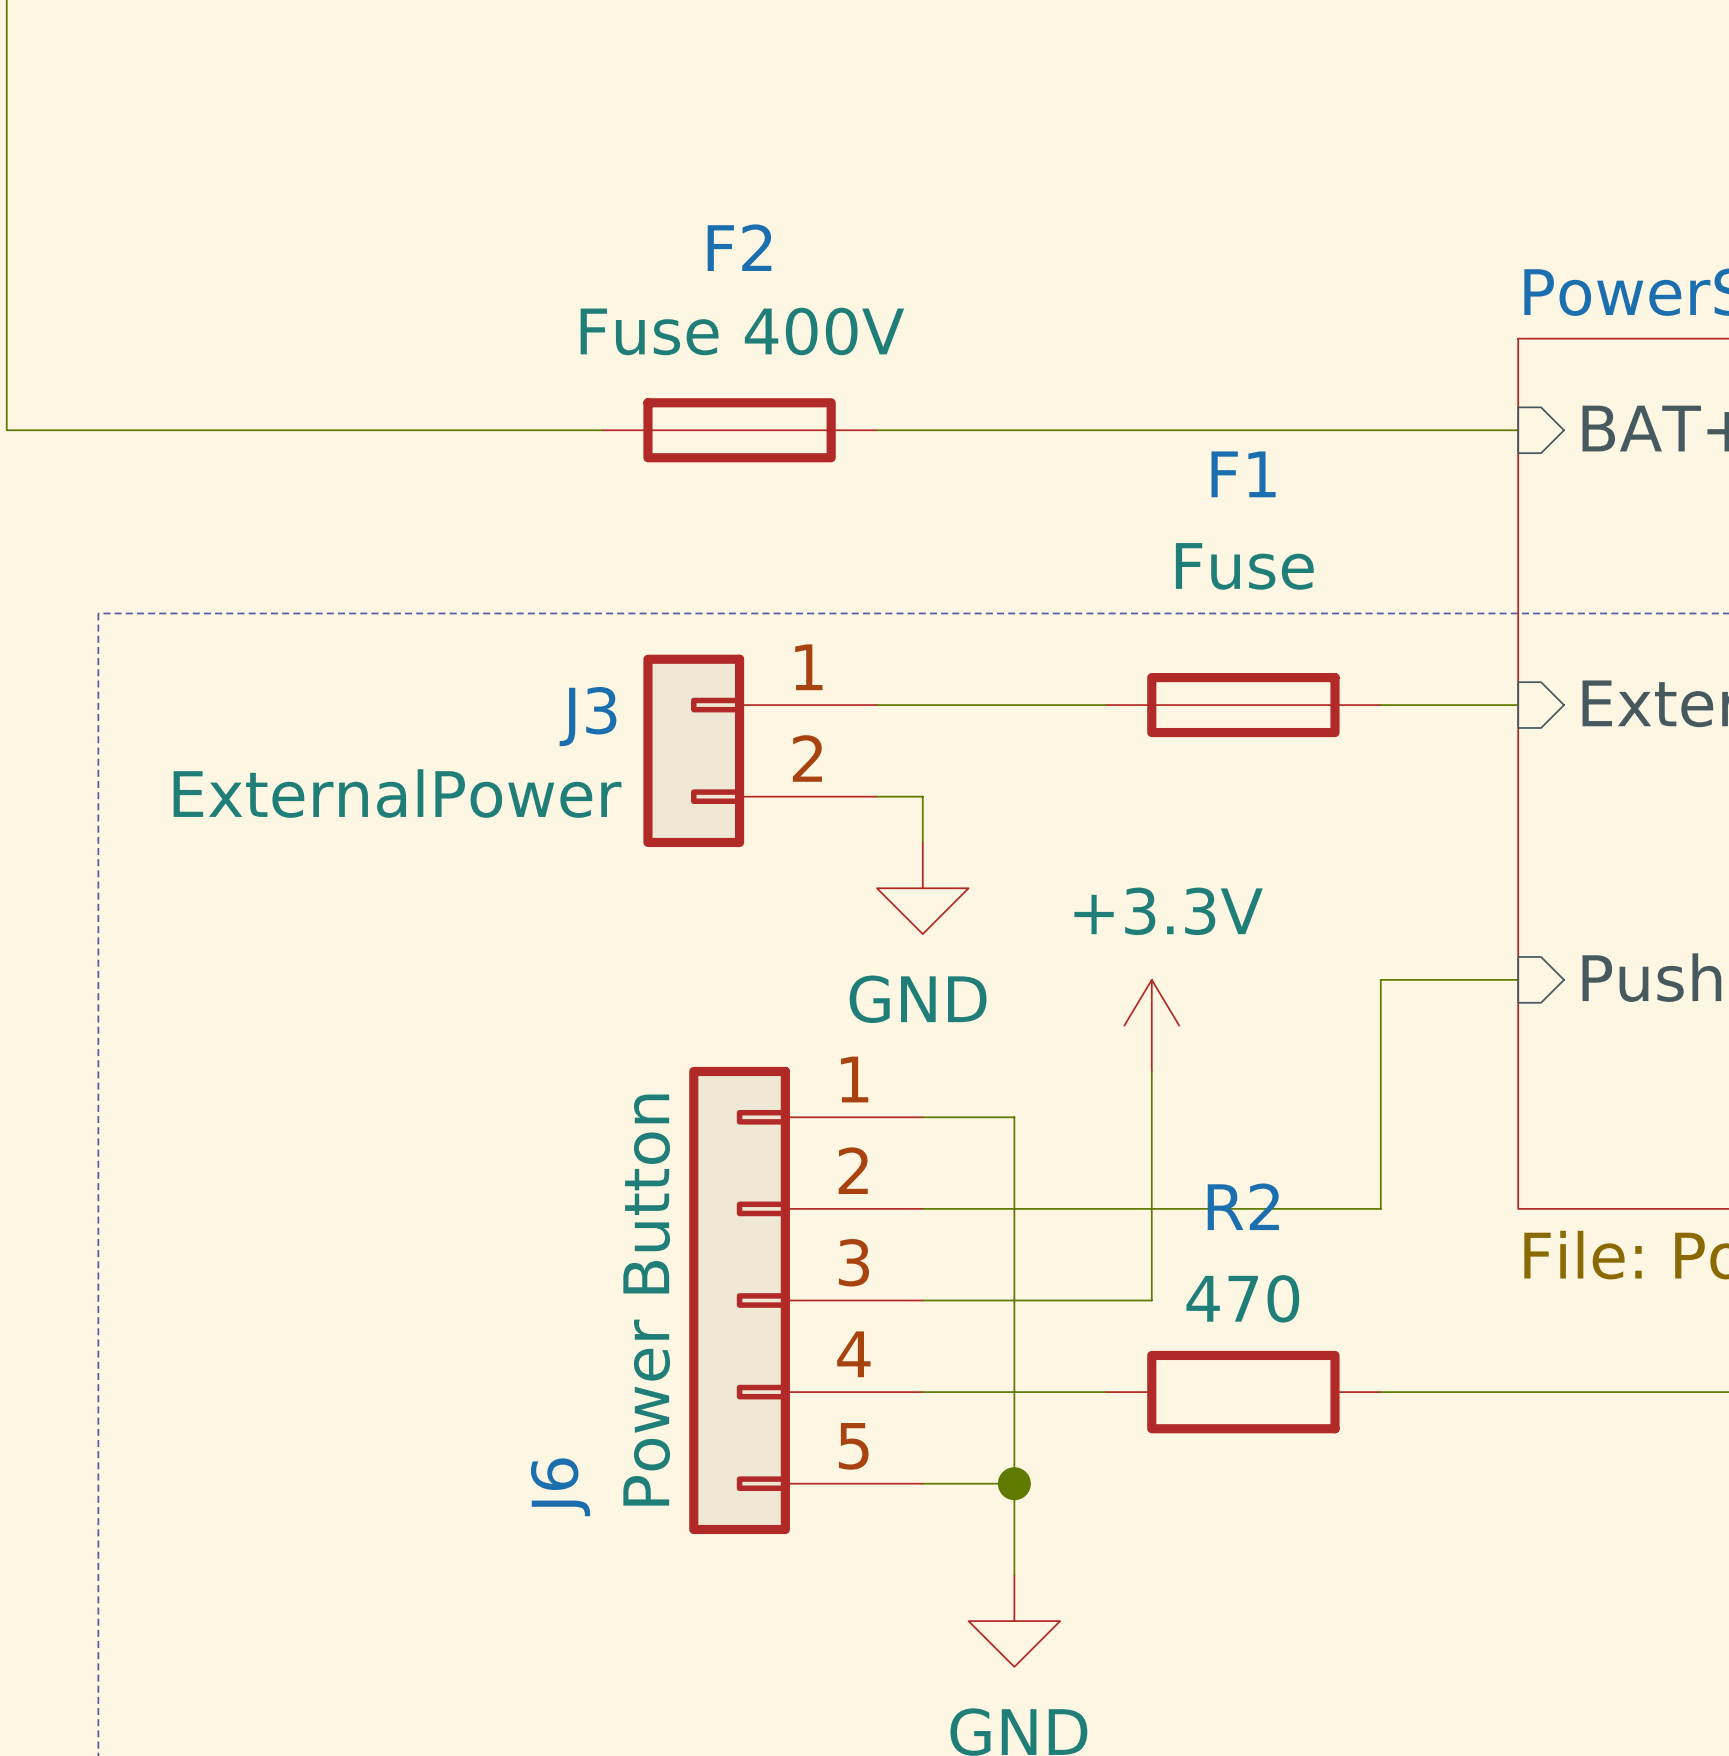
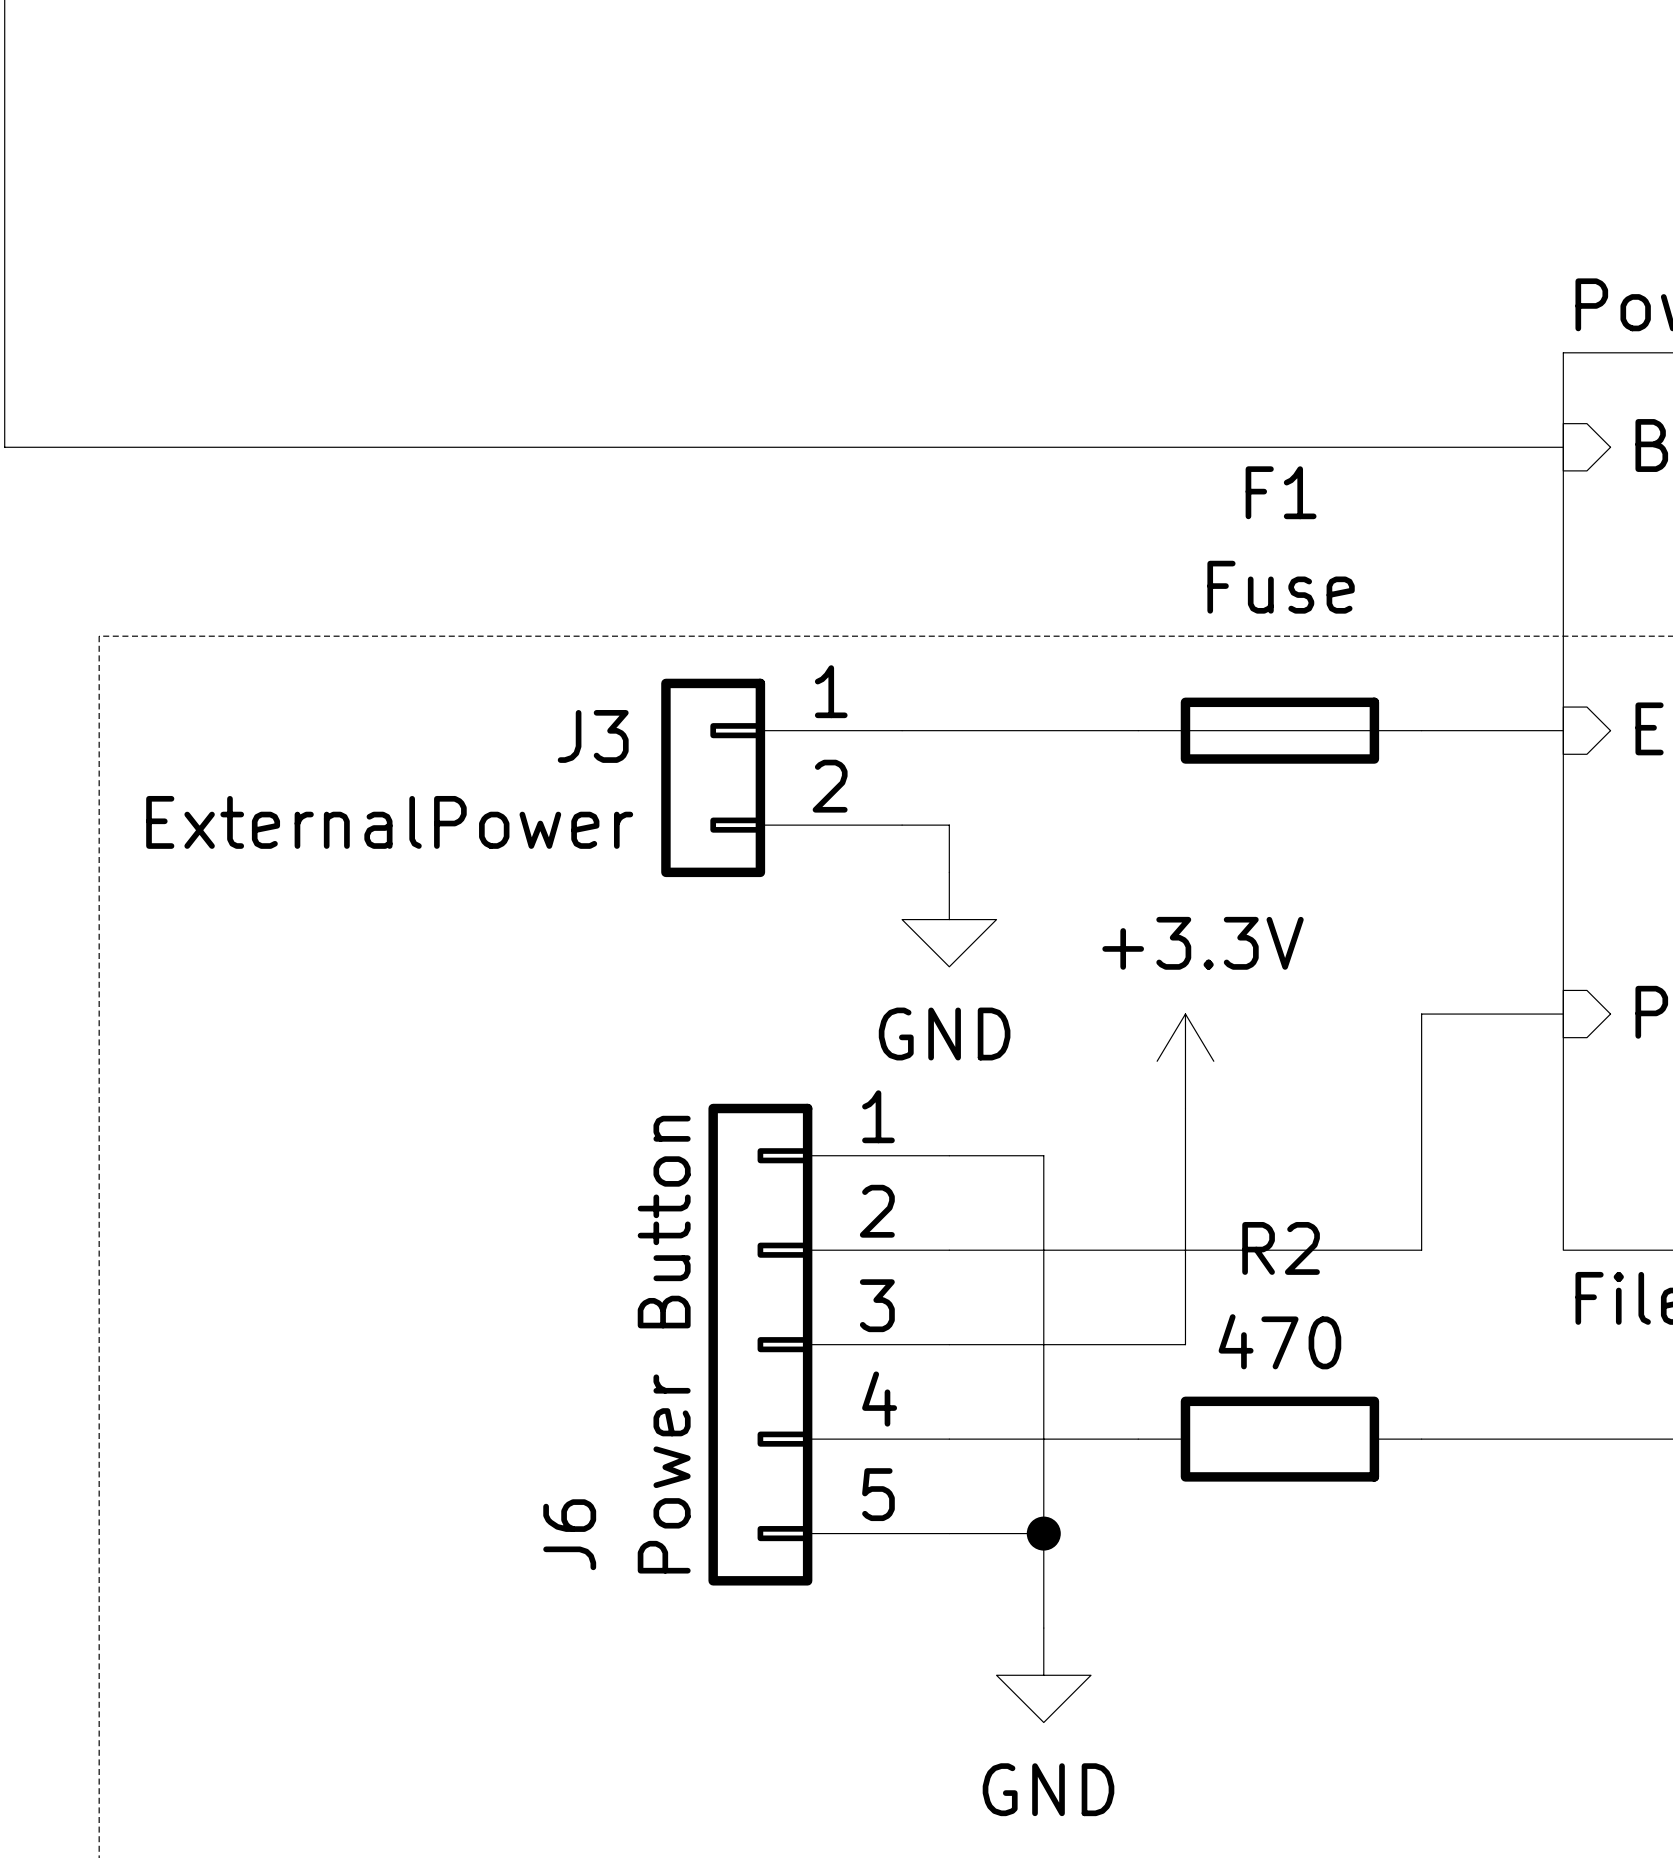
F2: Fuse 400V (739, 430) -> none

